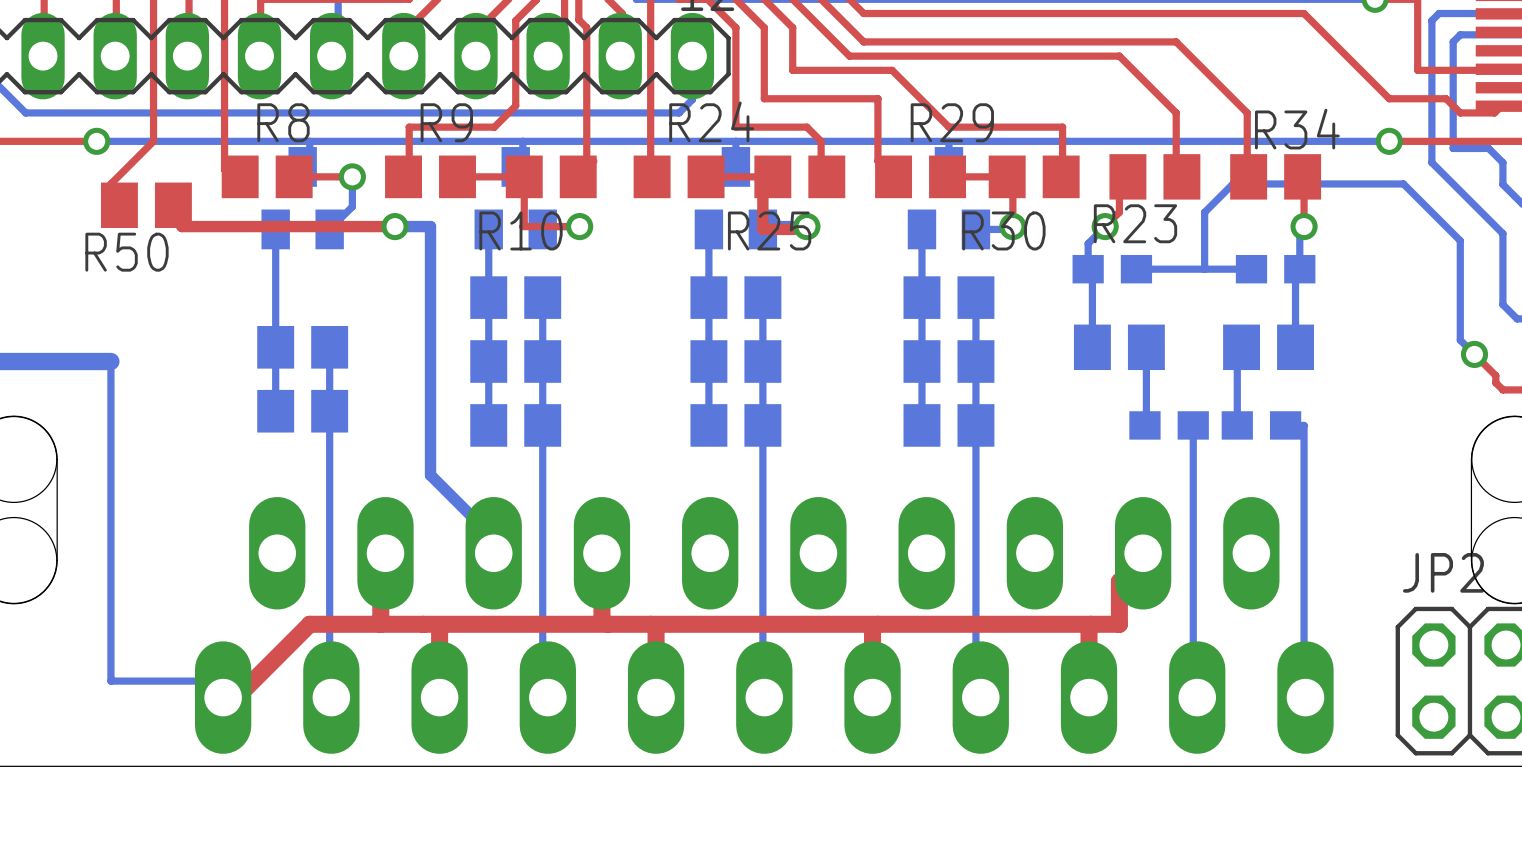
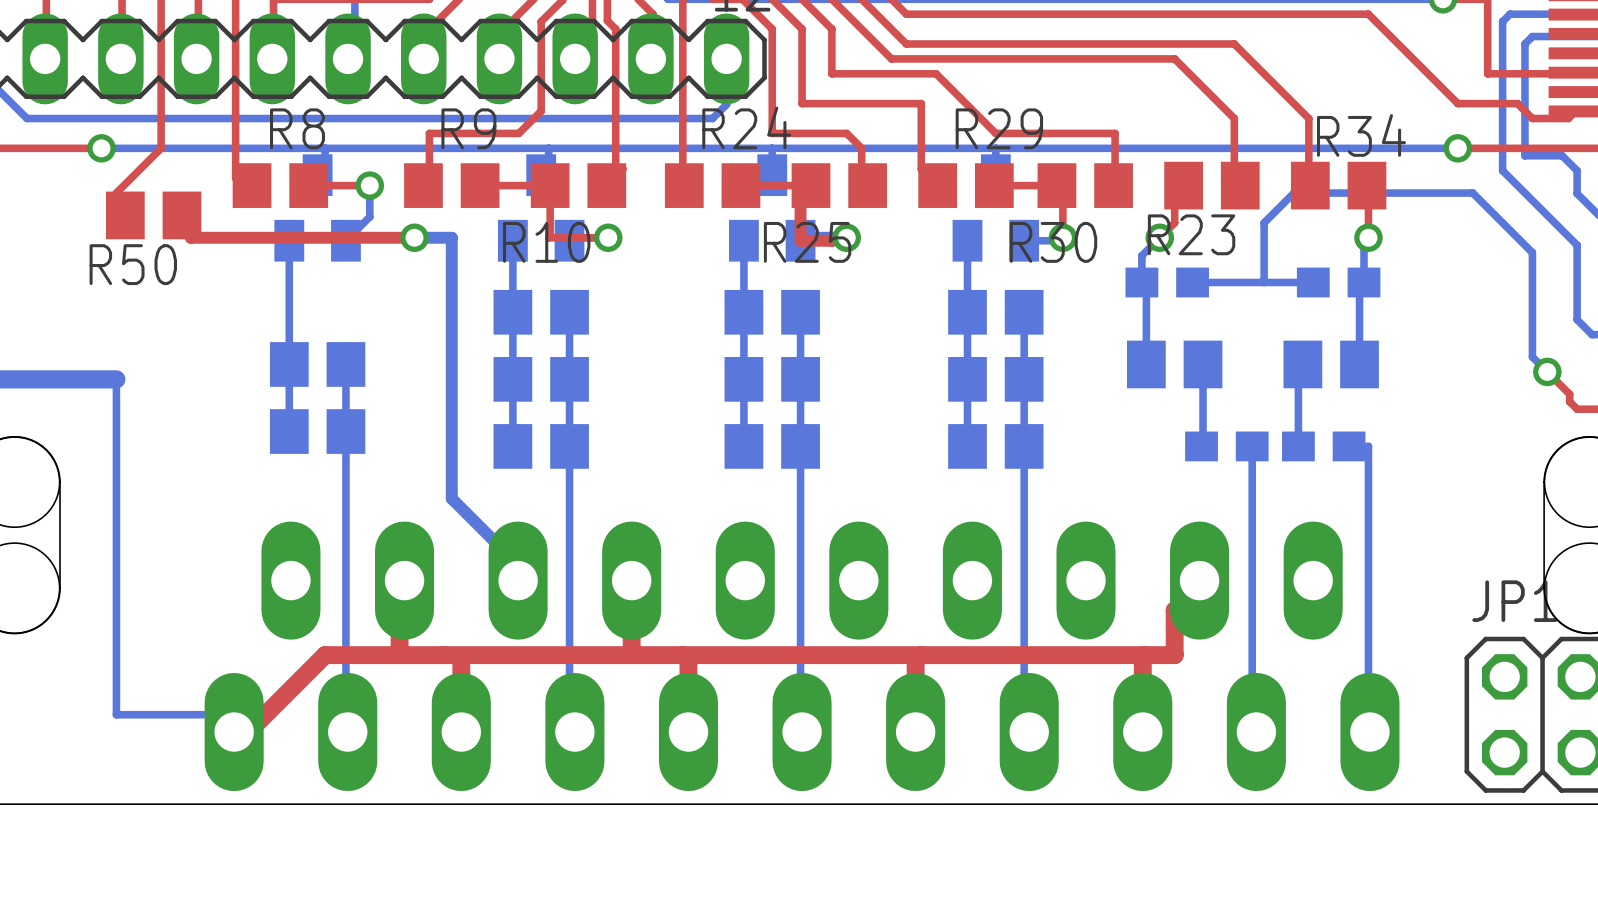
JP2 name: JP2 (1443, 572) -> JP1 (1514, 601)

